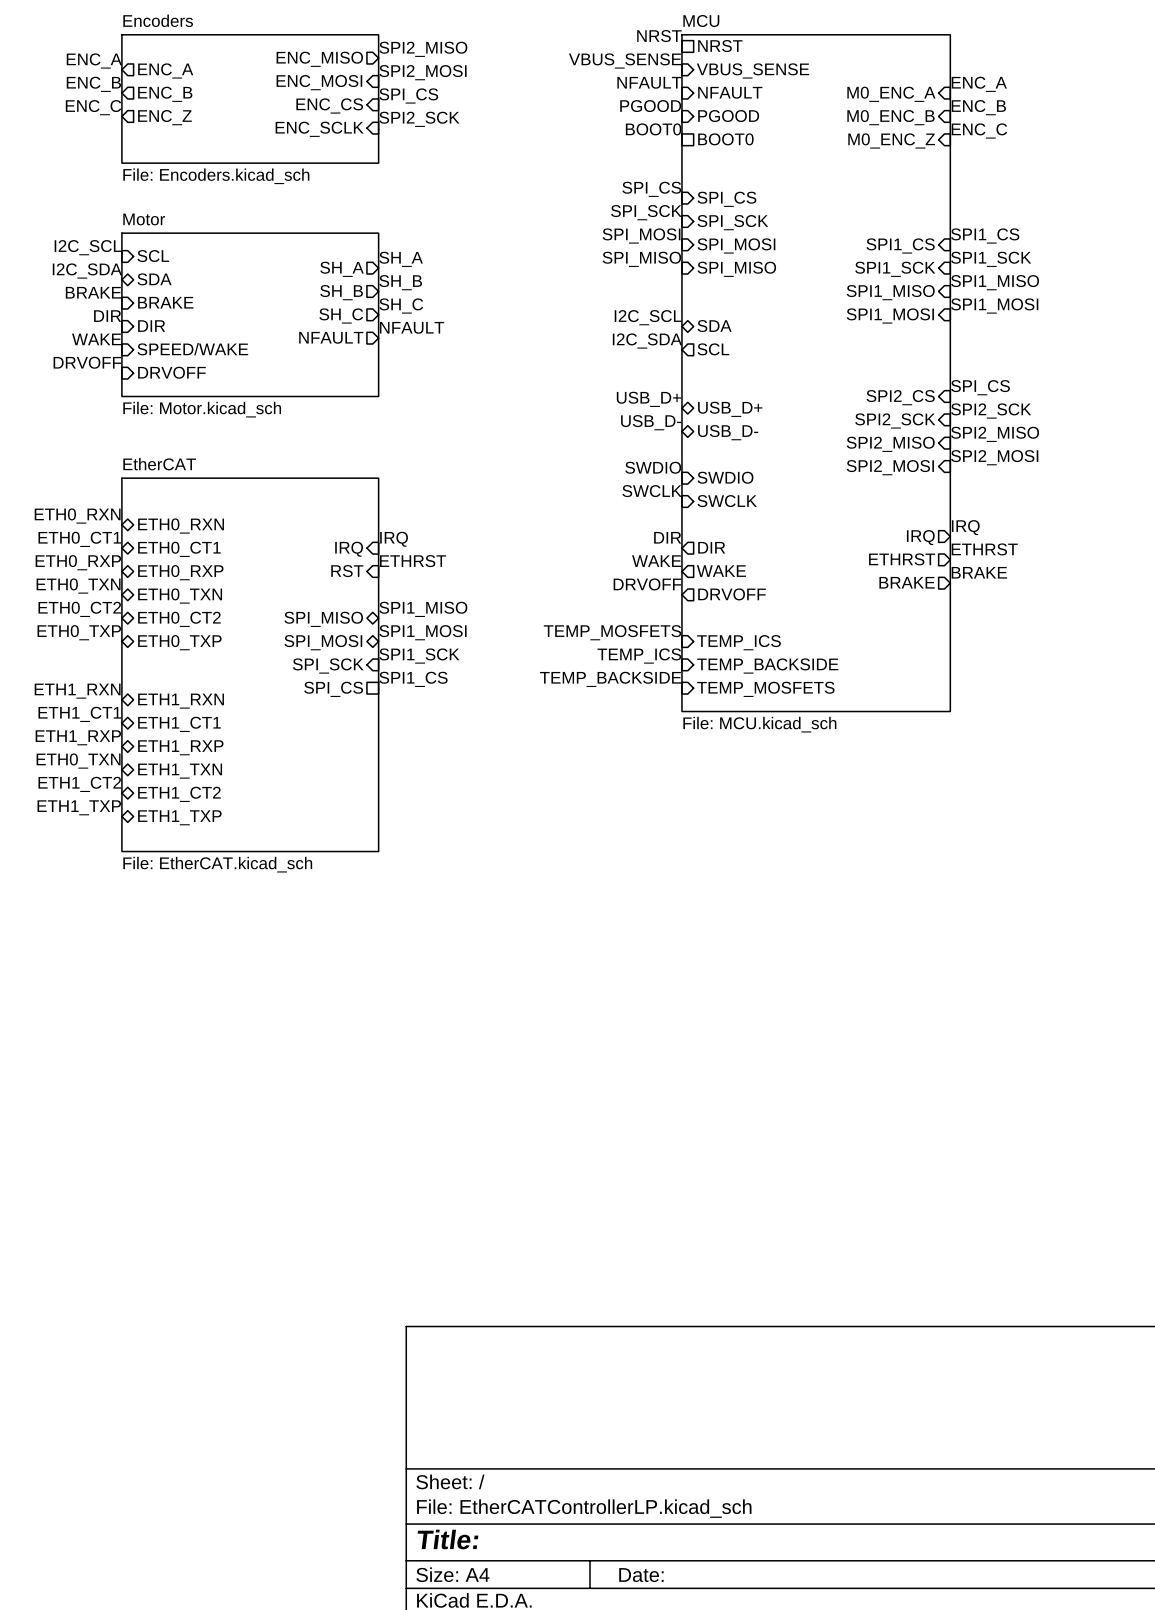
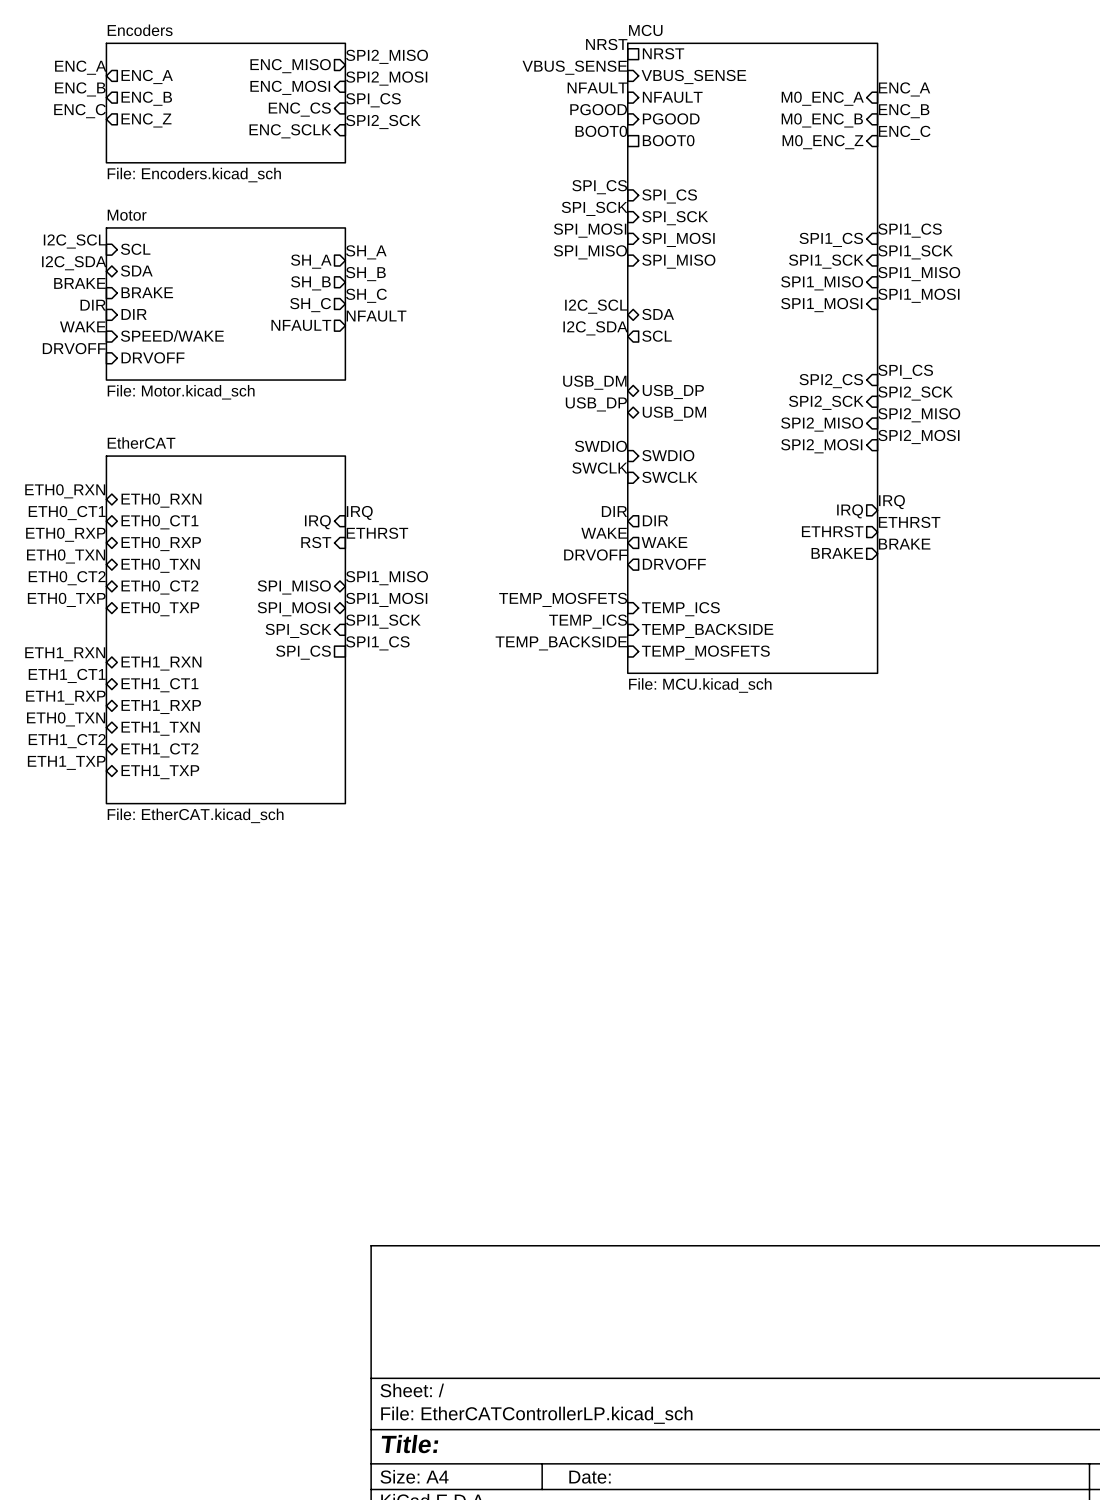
label: USB_D+ (648, 399) -> USB_DM (594, 382)
sheet pin: USB_D+ (730, 409) -> USB_DP (673, 391)
label: USB_D- (651, 422) -> USB_DP (596, 404)
sheet pin: USB_D- (728, 432) -> USB_DM (674, 413)

